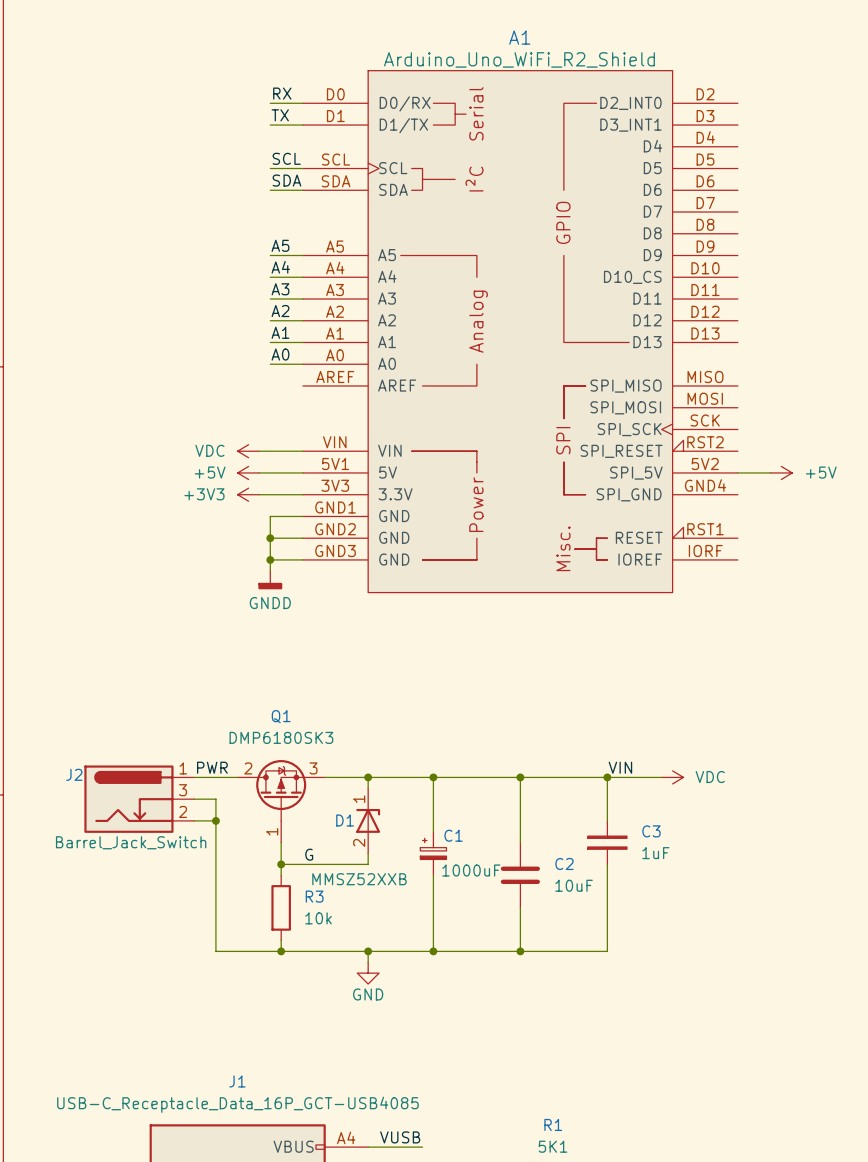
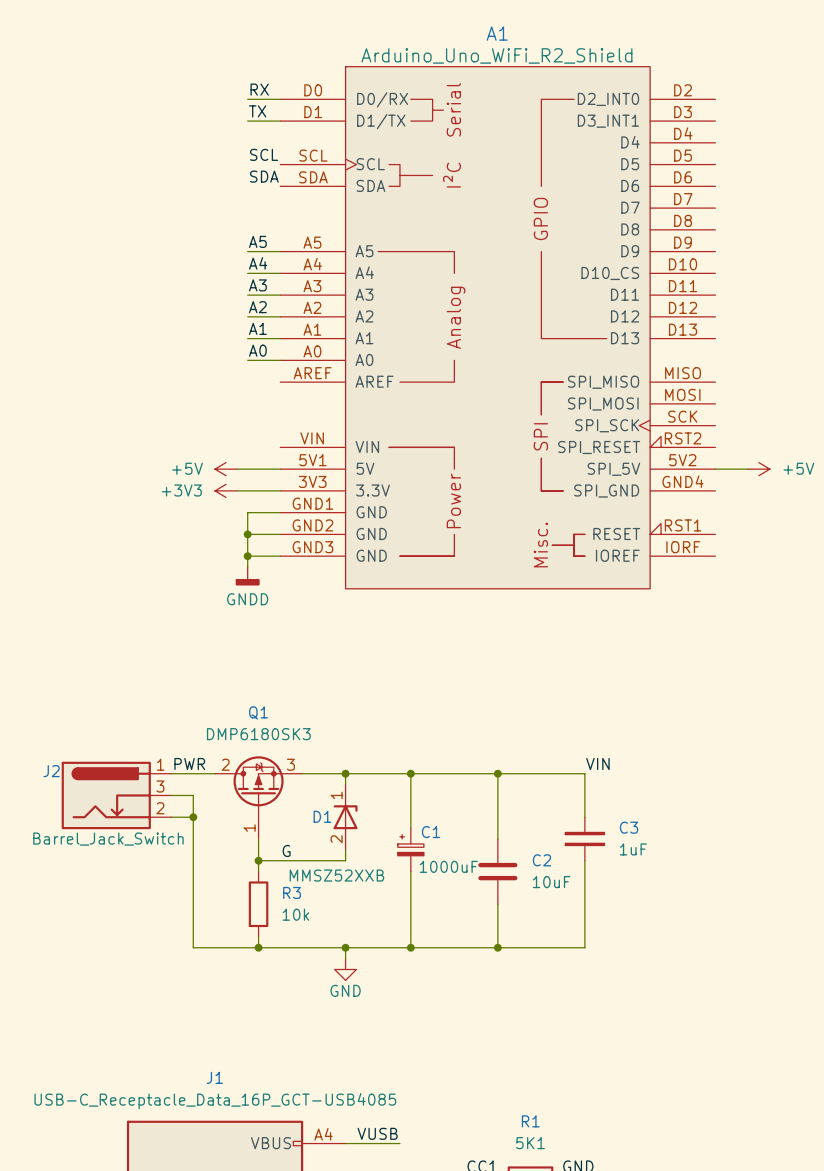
wire: (270, 168) (302, 168) -> none
wire: (270, 190) (302, 190) -> none
power symbol: VDC (248, 451) -> none
wire: (259, 451) (302, 451) -> none
wire: (607, 777) (661, 777) -> none
junction: (607, 777) -> none
power symbol: VDC (672, 777) -> none

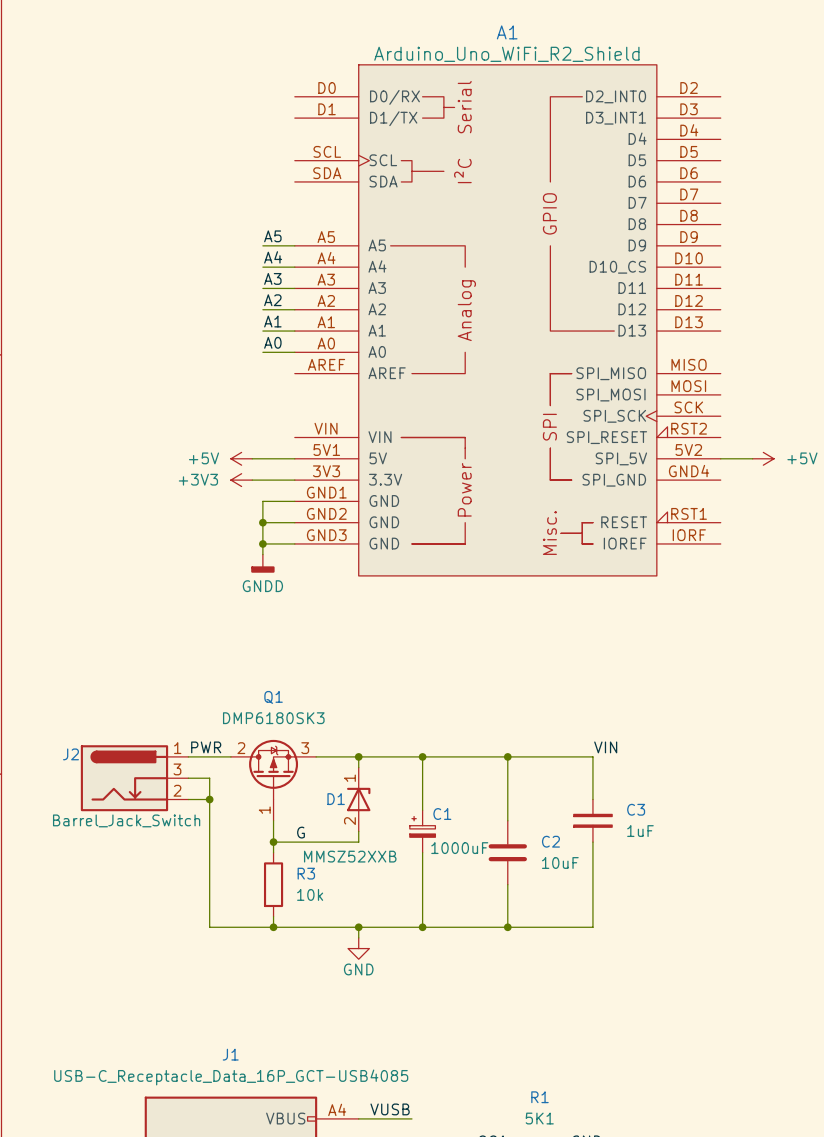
label: RX (259, 89) -> none
wire: (247, 99) (280, 99) -> none
label: TX (257, 111) -> none
wire: (247, 121) (280, 121) -> none
label: SCL (264, 154) -> none
label: SDA (264, 176) -> none

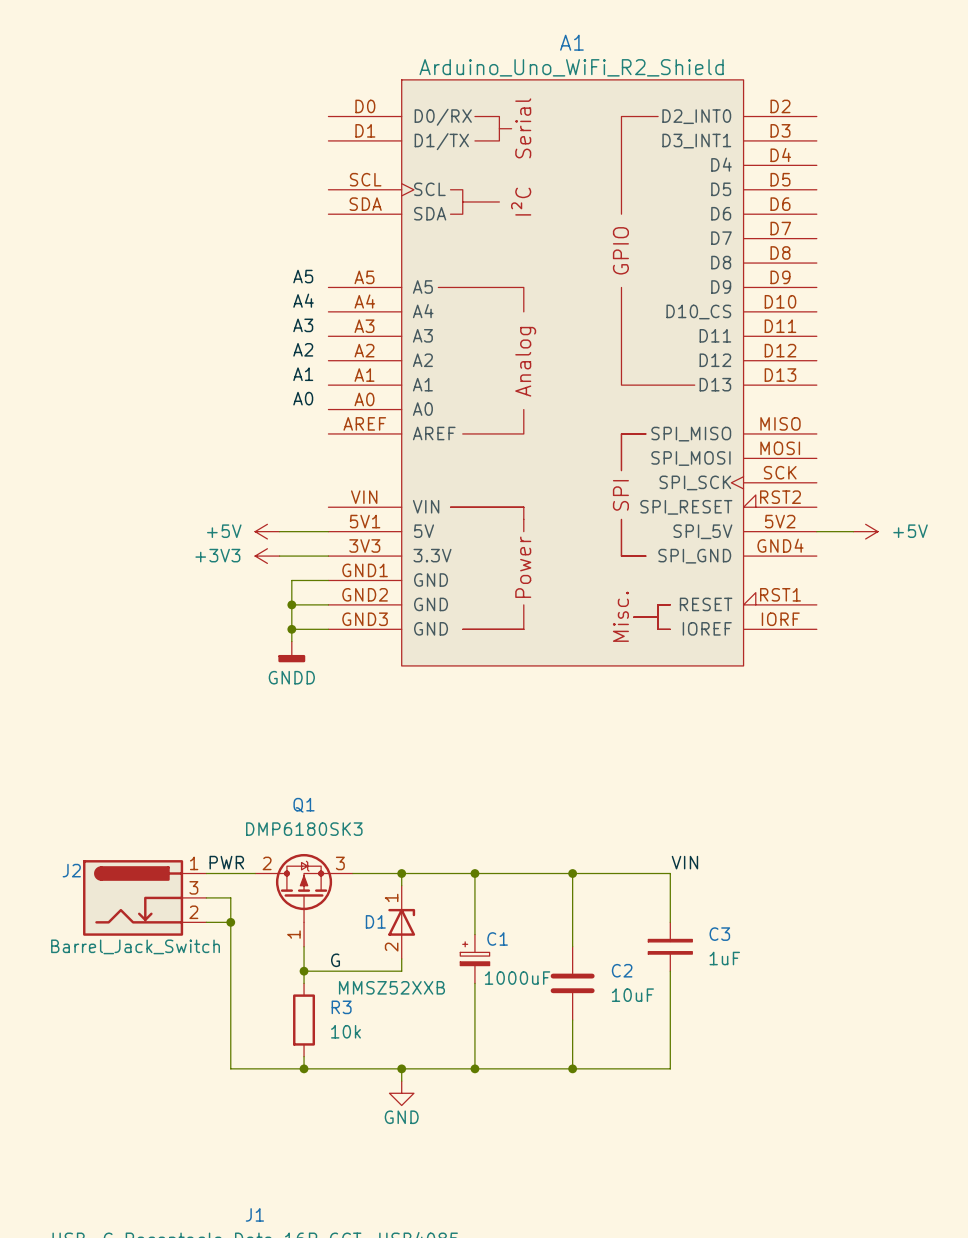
wire: (262, 245) (294, 245) -> none
wire: (262, 267) (294, 267) -> none
wire: (262, 288) (294, 288) -> none
wire: (262, 309) (294, 309) -> none
wire: (262, 331) (294, 331) -> none
wire: (262, 352) (294, 352) -> none

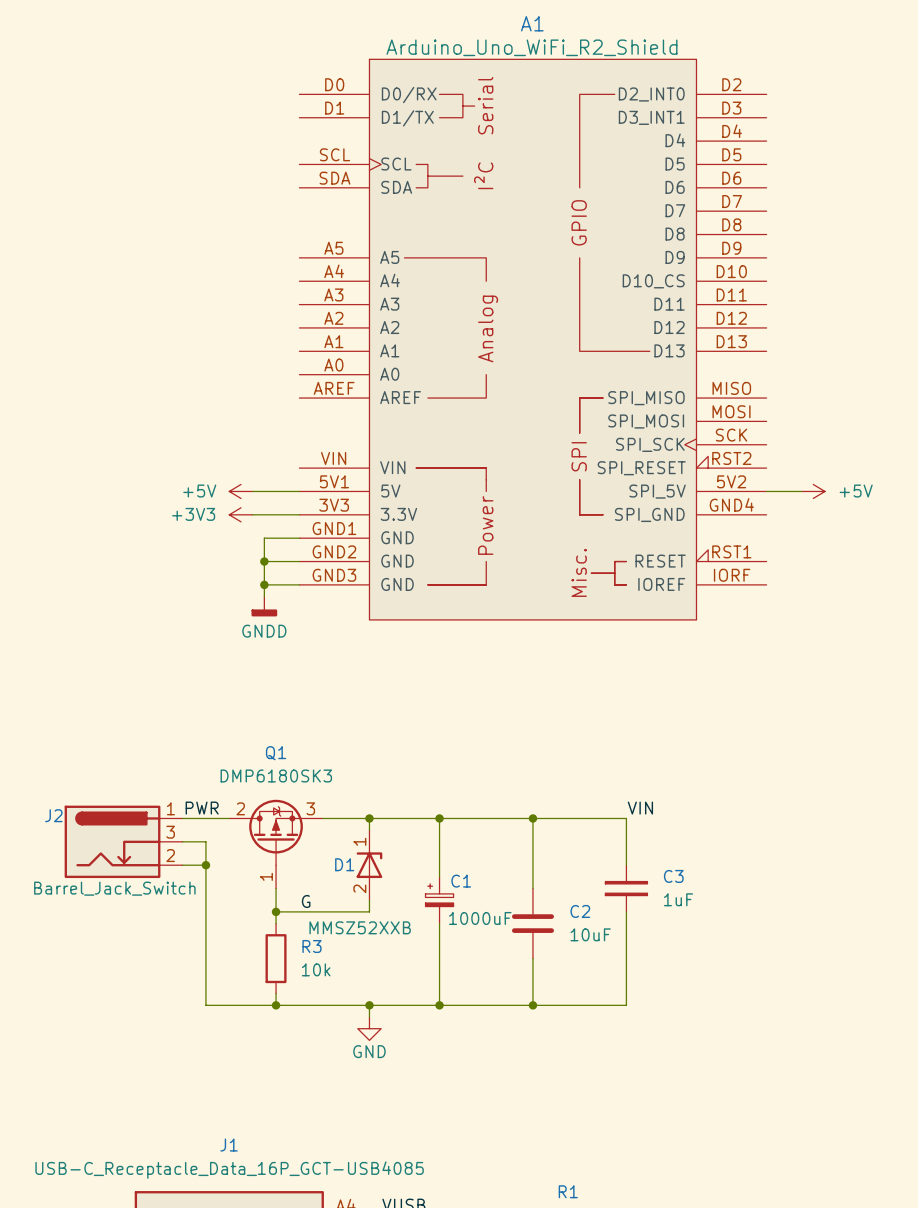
label: A5 (303, 276) -> none
label: A4 (303, 300) -> none
label: A3 (303, 325) -> none
label: A2 (303, 349) -> none
label: A1 (303, 374) -> none
label: A0 (303, 398) -> none

